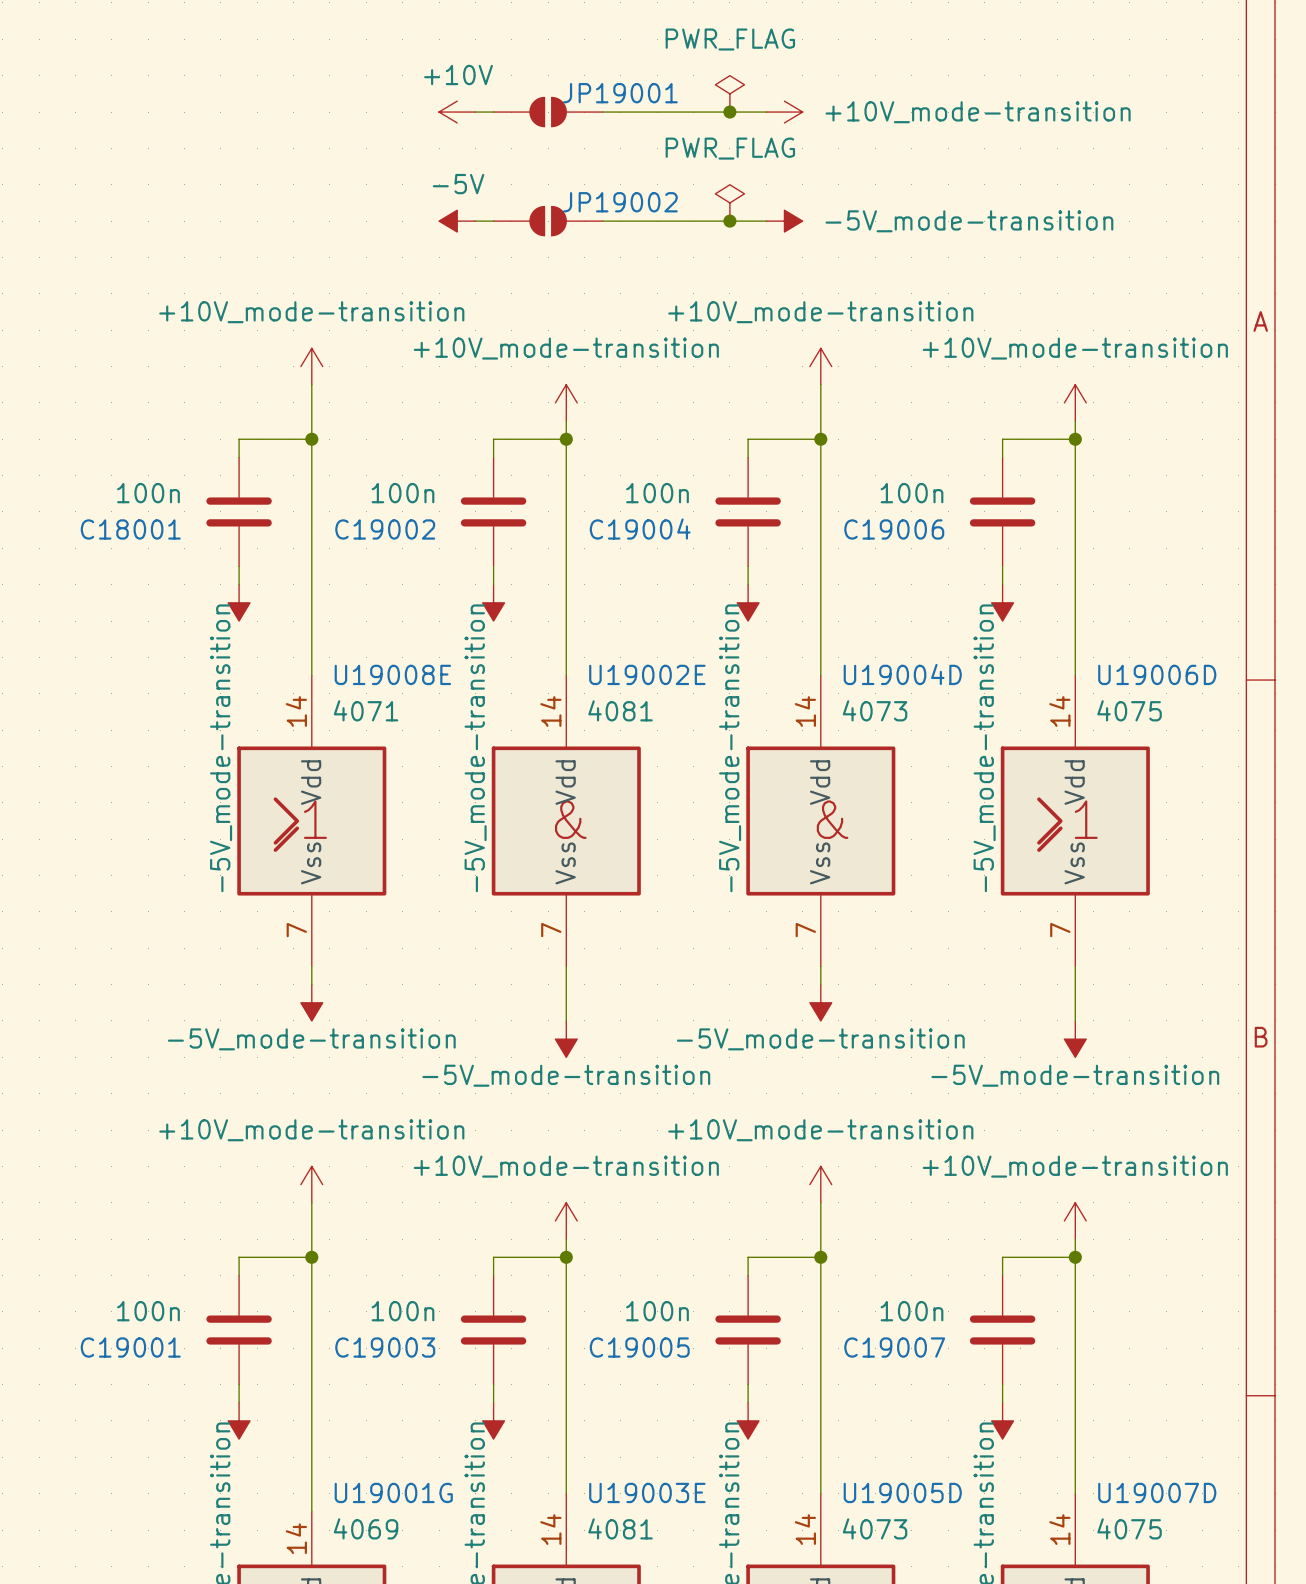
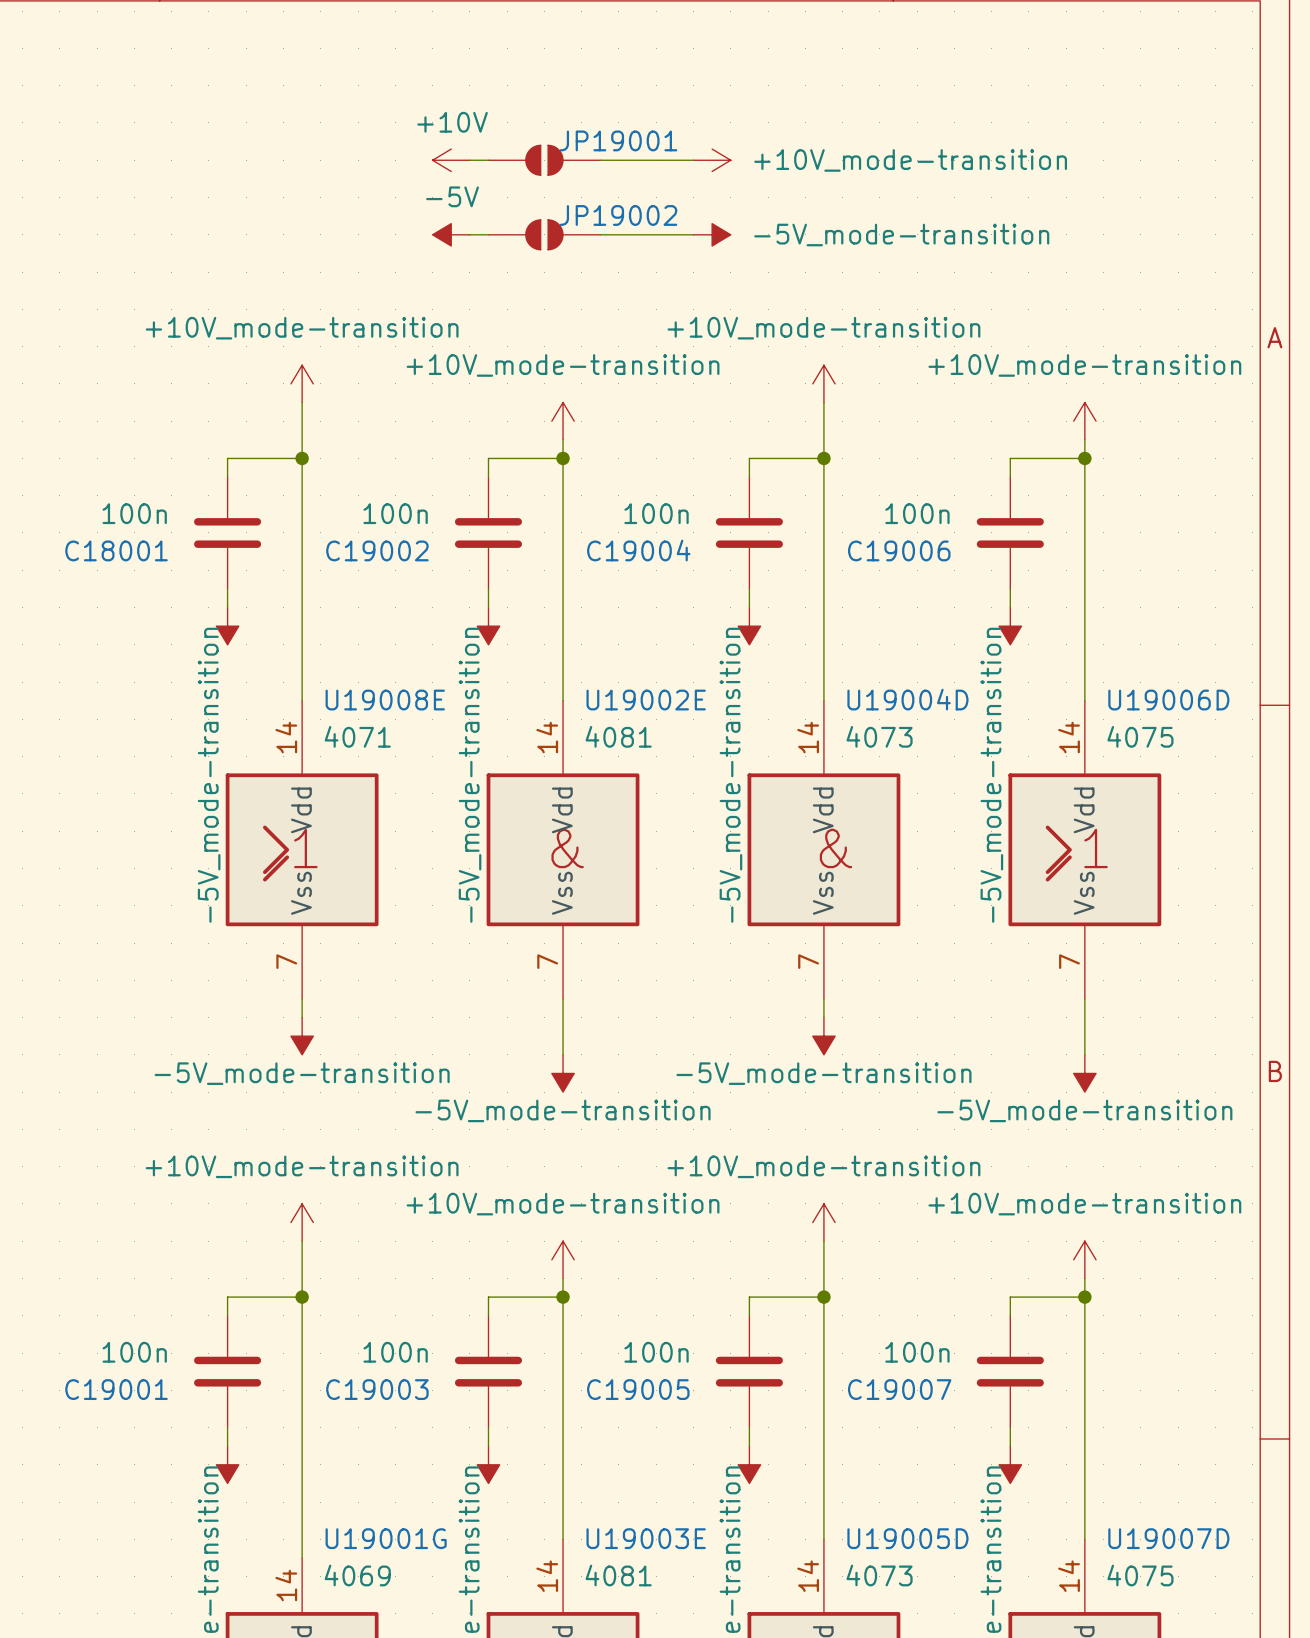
power symbol: PWR_FLAG (729, 93) -> none
power symbol position: +10V (457, 112) -> +10V (451, 160)
wire: (475, 112) (493, 112) -> (469, 160) (488, 160)
JP19001 position: (548, 112) -> (544, 160)
wire: (602, 112) (766, 112) -> none
junction: (729, 112) -> none
power symbol position: +10V_mode-transition (784, 112) -> +10V_mode-transition (712, 160)
wire: none -> (600, 160) (693, 160)
power symbol: PWR_FLAG (729, 202) -> none
wire: (693, 221) (766, 221) -> none
junction: (729, 221) -> none
power symbol position: -5V_mode-transition (784, 221) -> -5V_mode-transition (712, 234)

